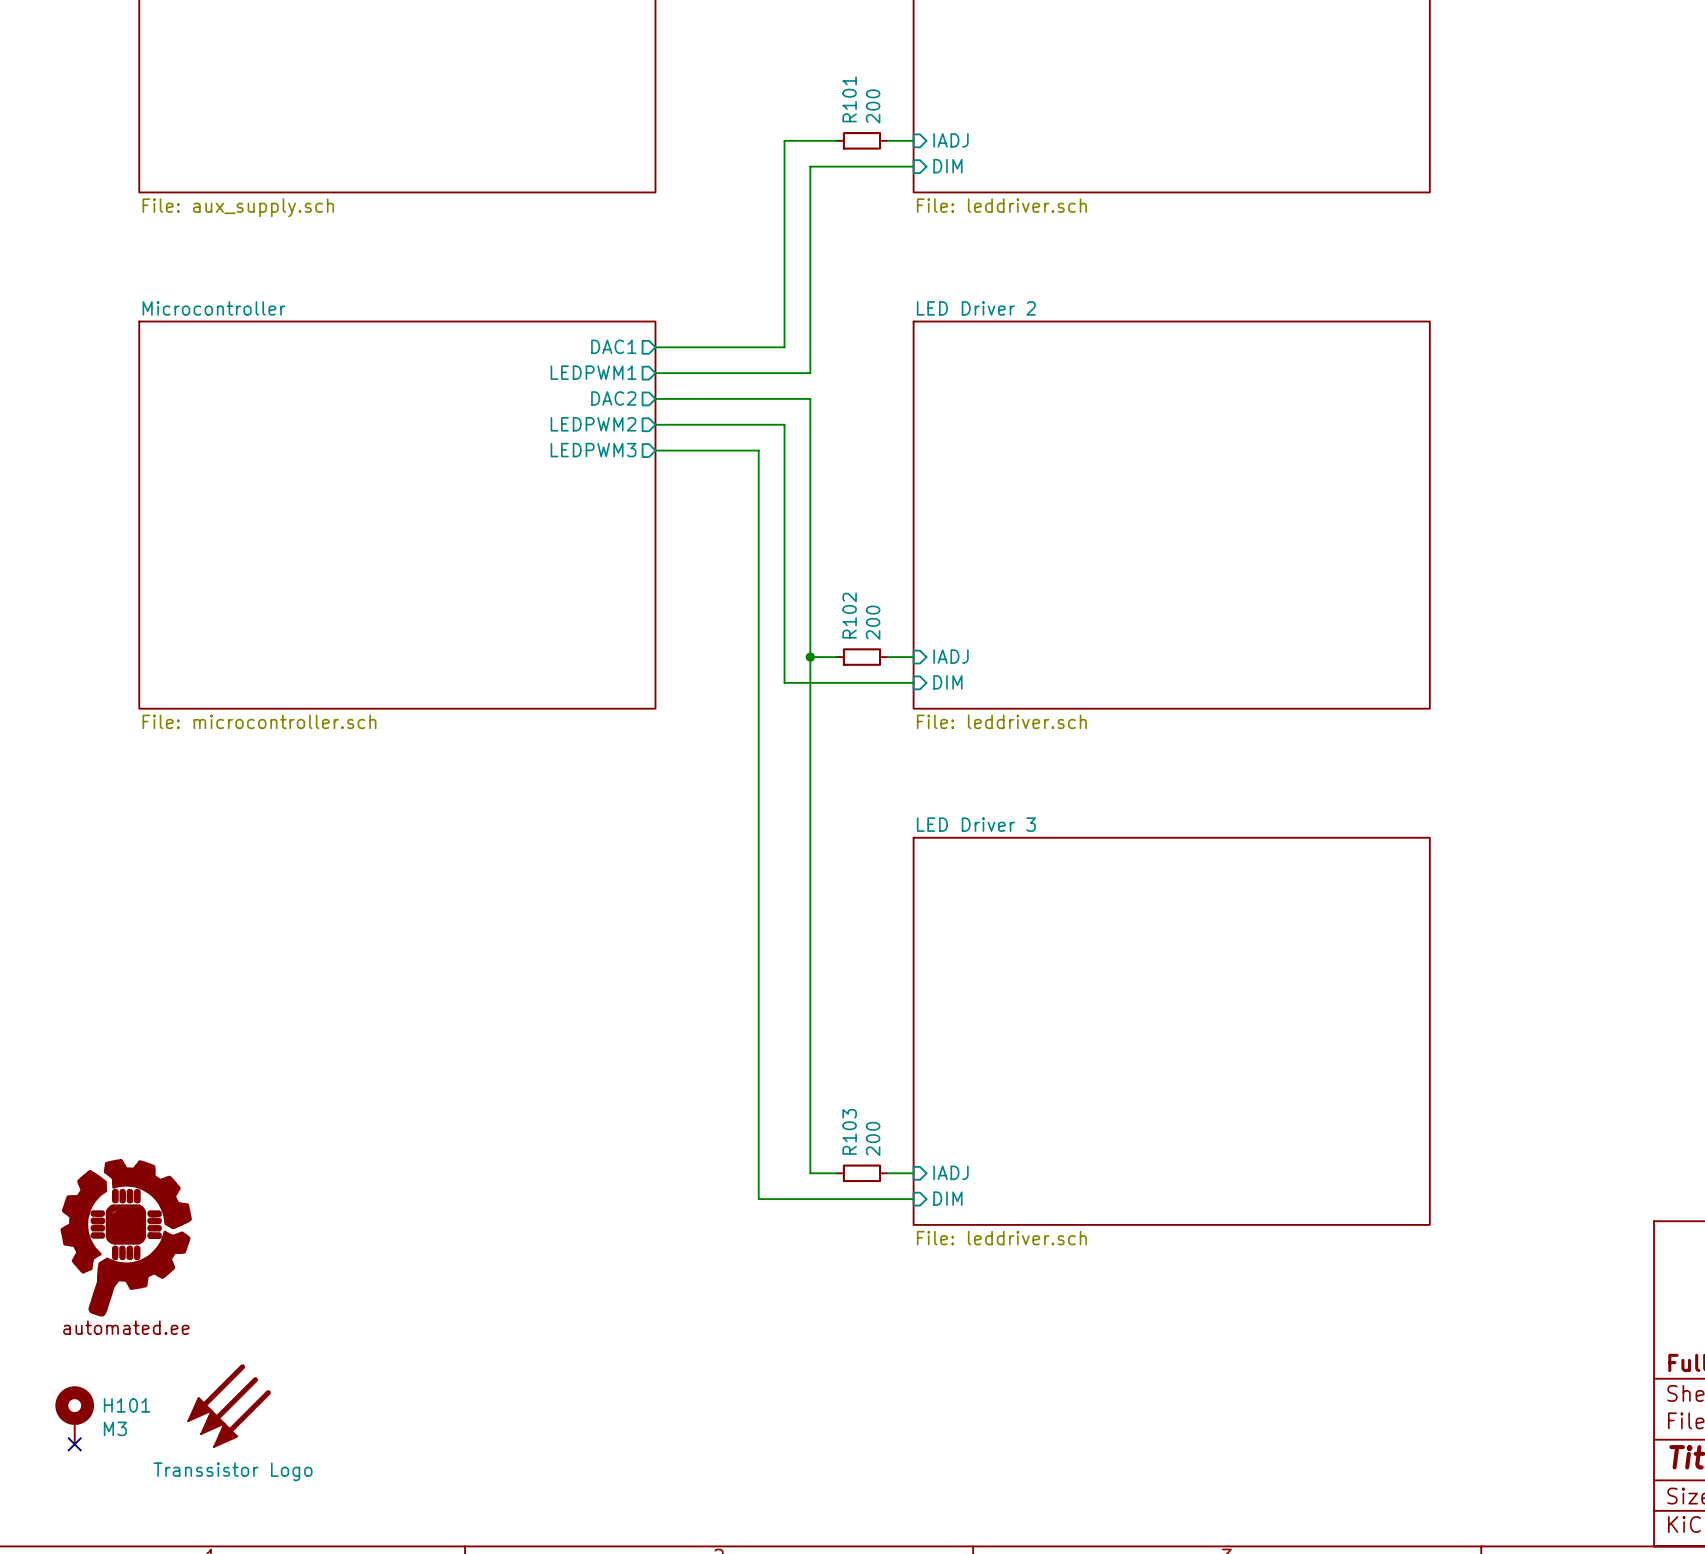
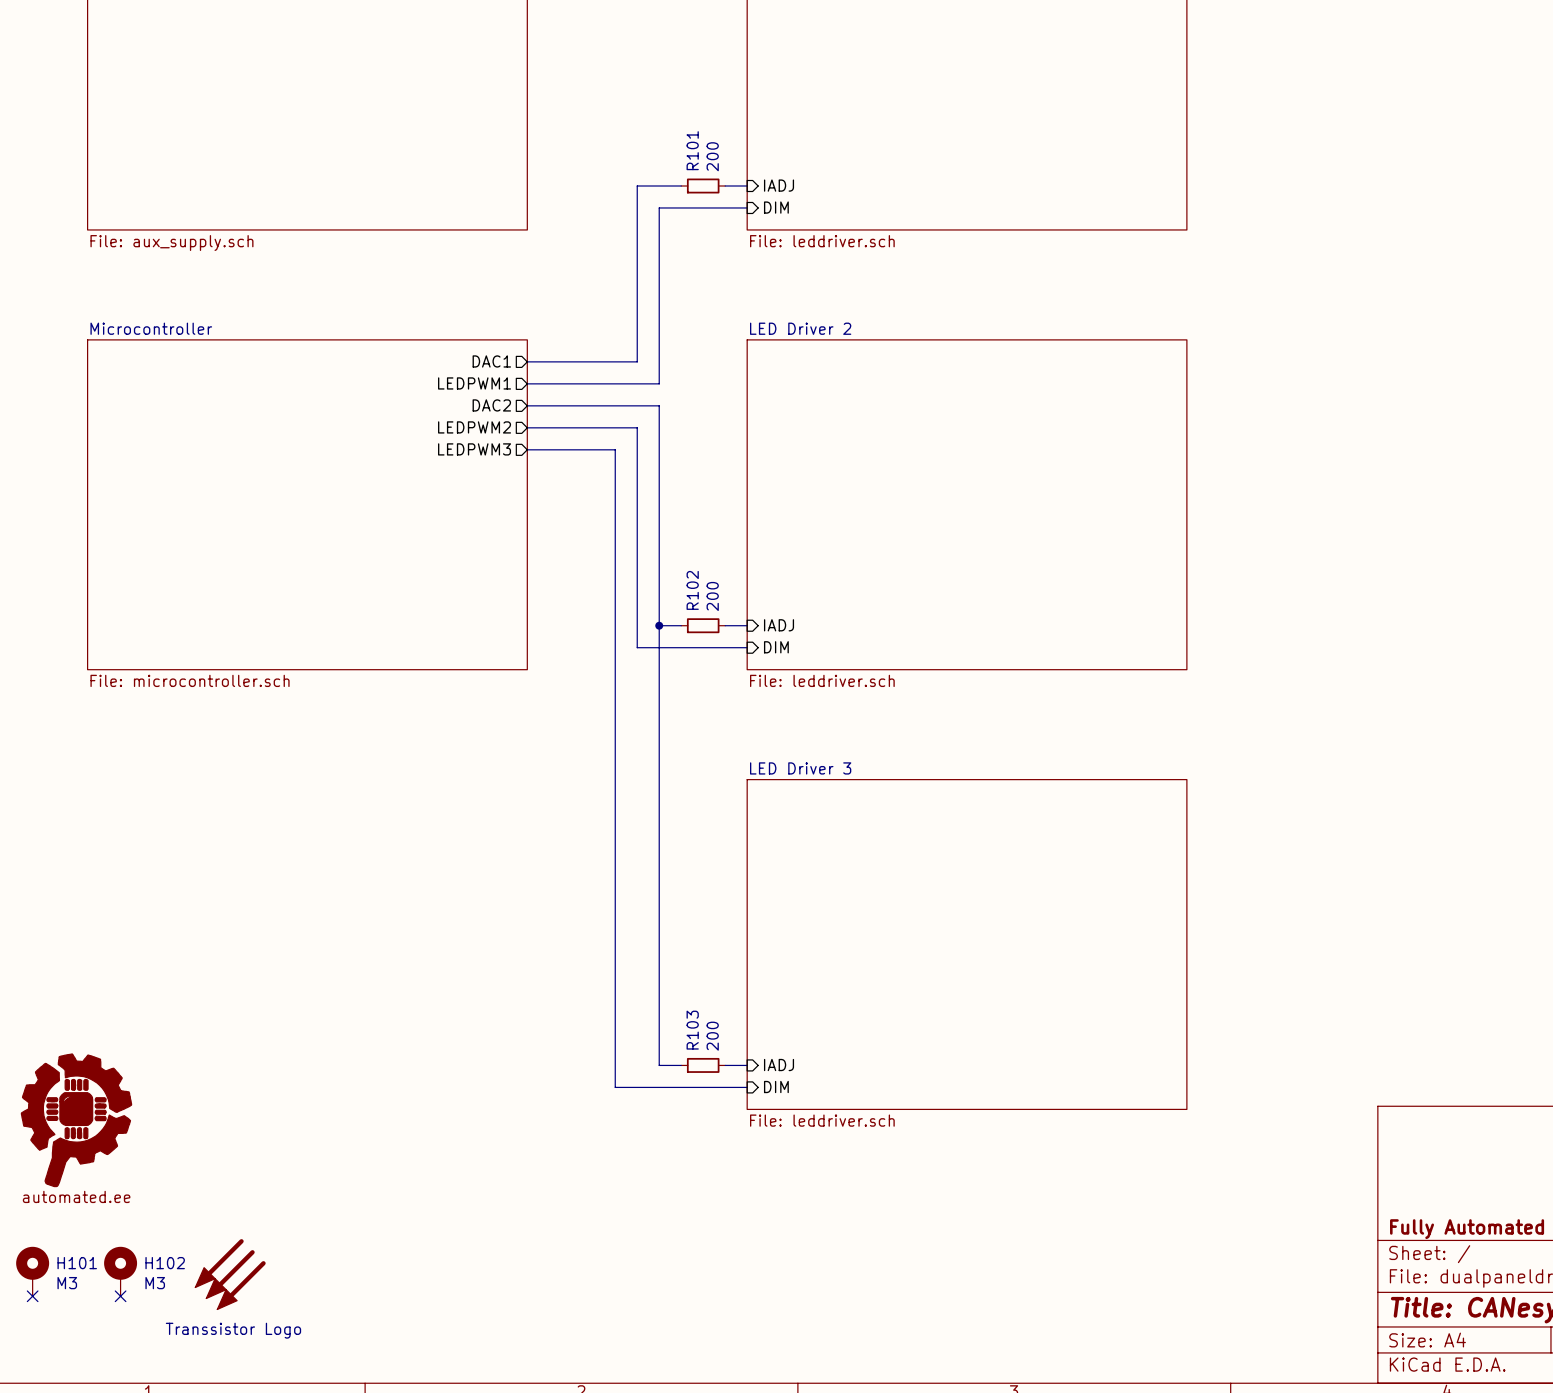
power symbol: (216, 1392) -> none
part position: (229, 1405) -> (230, 1274)
power symbol: none -> (219, 1263)
H102: none -> M3 (120, 1271)
power symbol: (242, 1418) -> none
power symbol: none -> (241, 1285)
no-connect mark: none -> (120, 1296)

